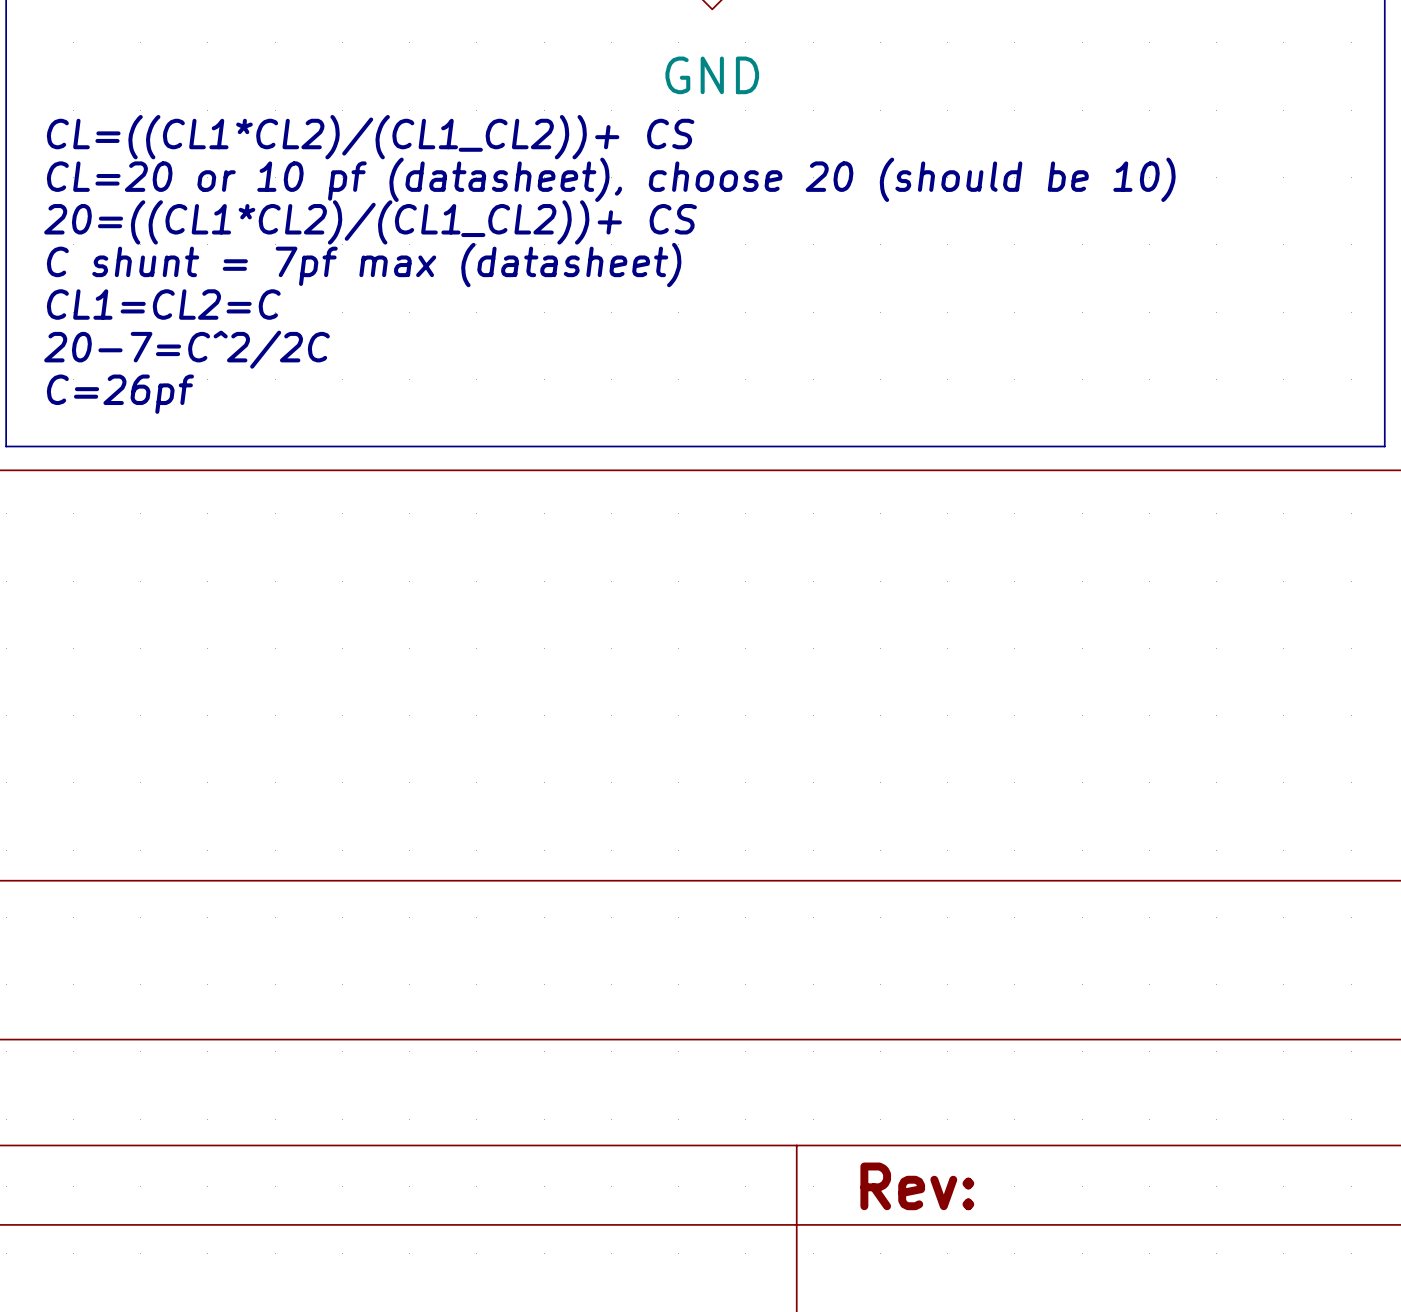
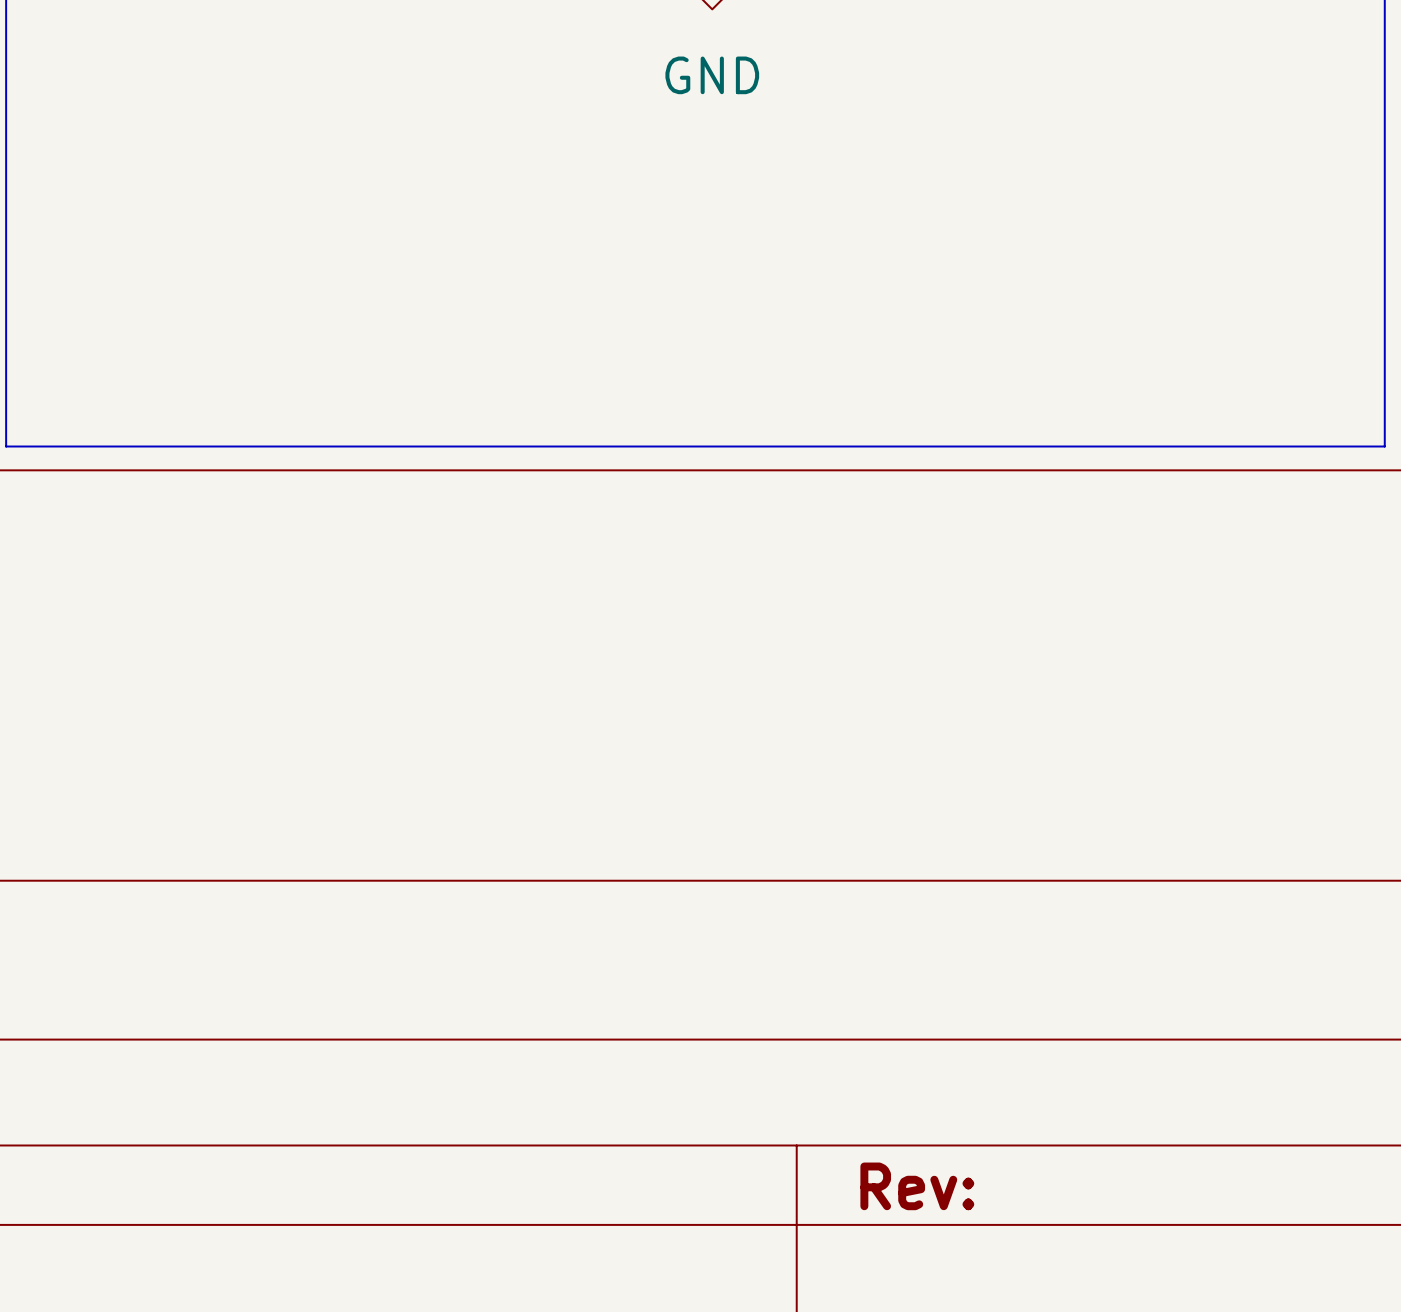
text: CL=((CL1*CL2)/(CL1_CL2))+ CS (370, 137) -> none
text: CL=20 or 10 pf (datasheet), choose 20 (should be 10) (611, 179) -> none
text: 20=((CL1*CL2)/(CL1_CL2))+ CS (370, 222) -> none
text: C shunt = 7pf max (datasheet) (364, 265) -> none
text: CL1=CL2=C (163, 304) -> none
text: 20-7=C^2/2C (187, 349) -> none
text: C=26pf (120, 394) -> none

